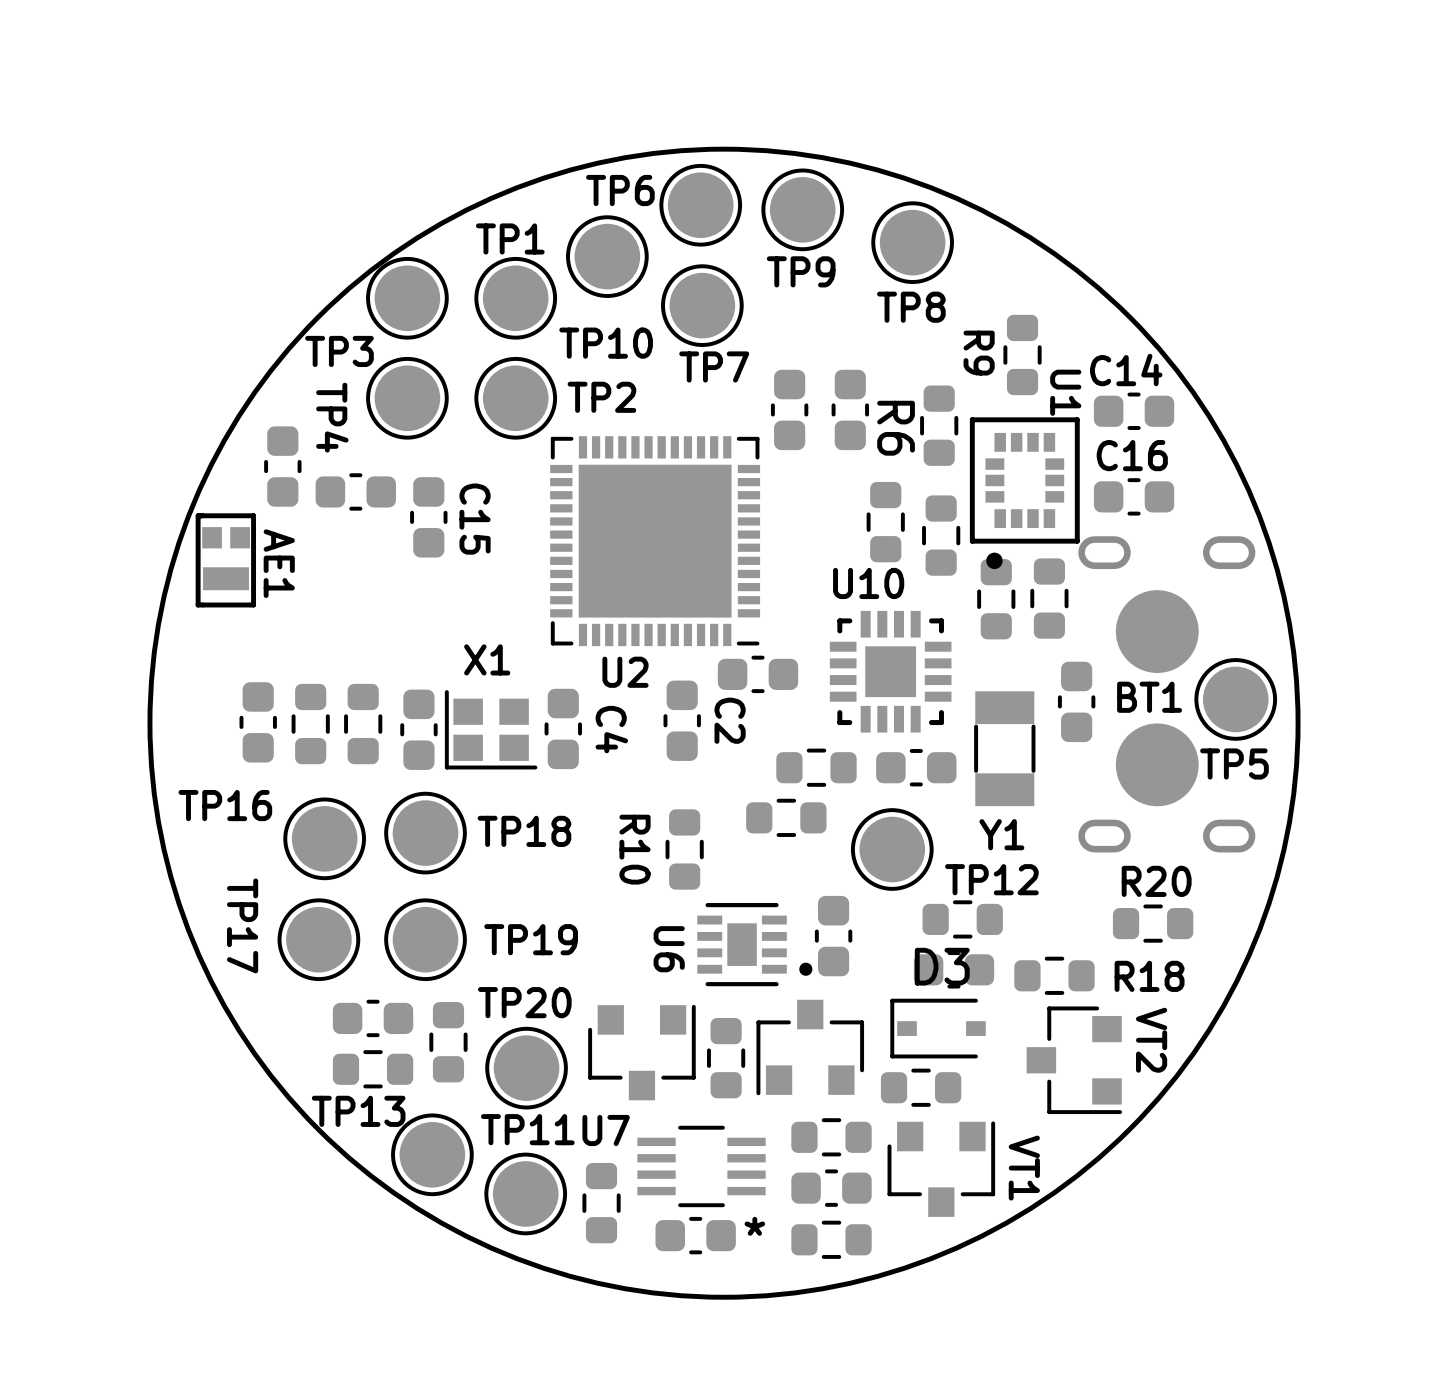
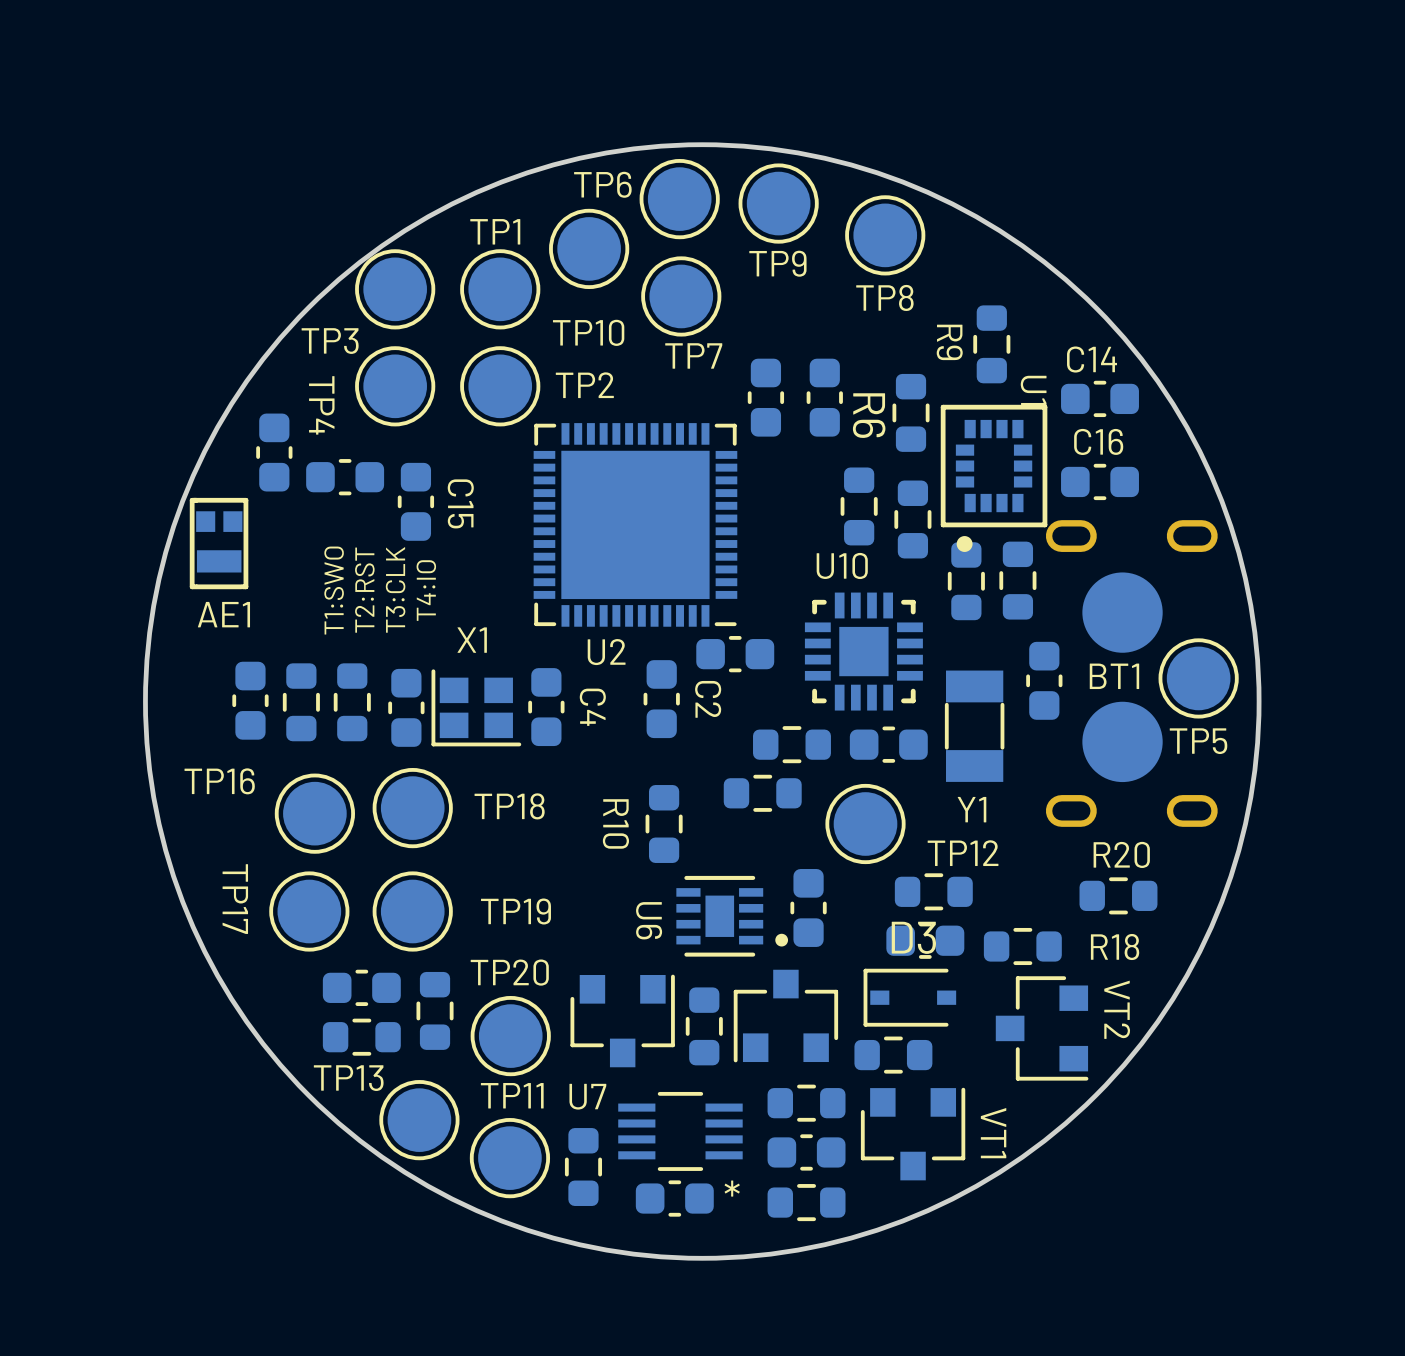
AE1 name rotation: 0° (279, 563) -> 90° counterclockwise (223, 614)
text: none -> T2:RST (364, 590)
text: none -> T1:SWO (334, 590)
text: none -> T3:CLK (395, 589)
text: none -> T4:IO (426, 590)

